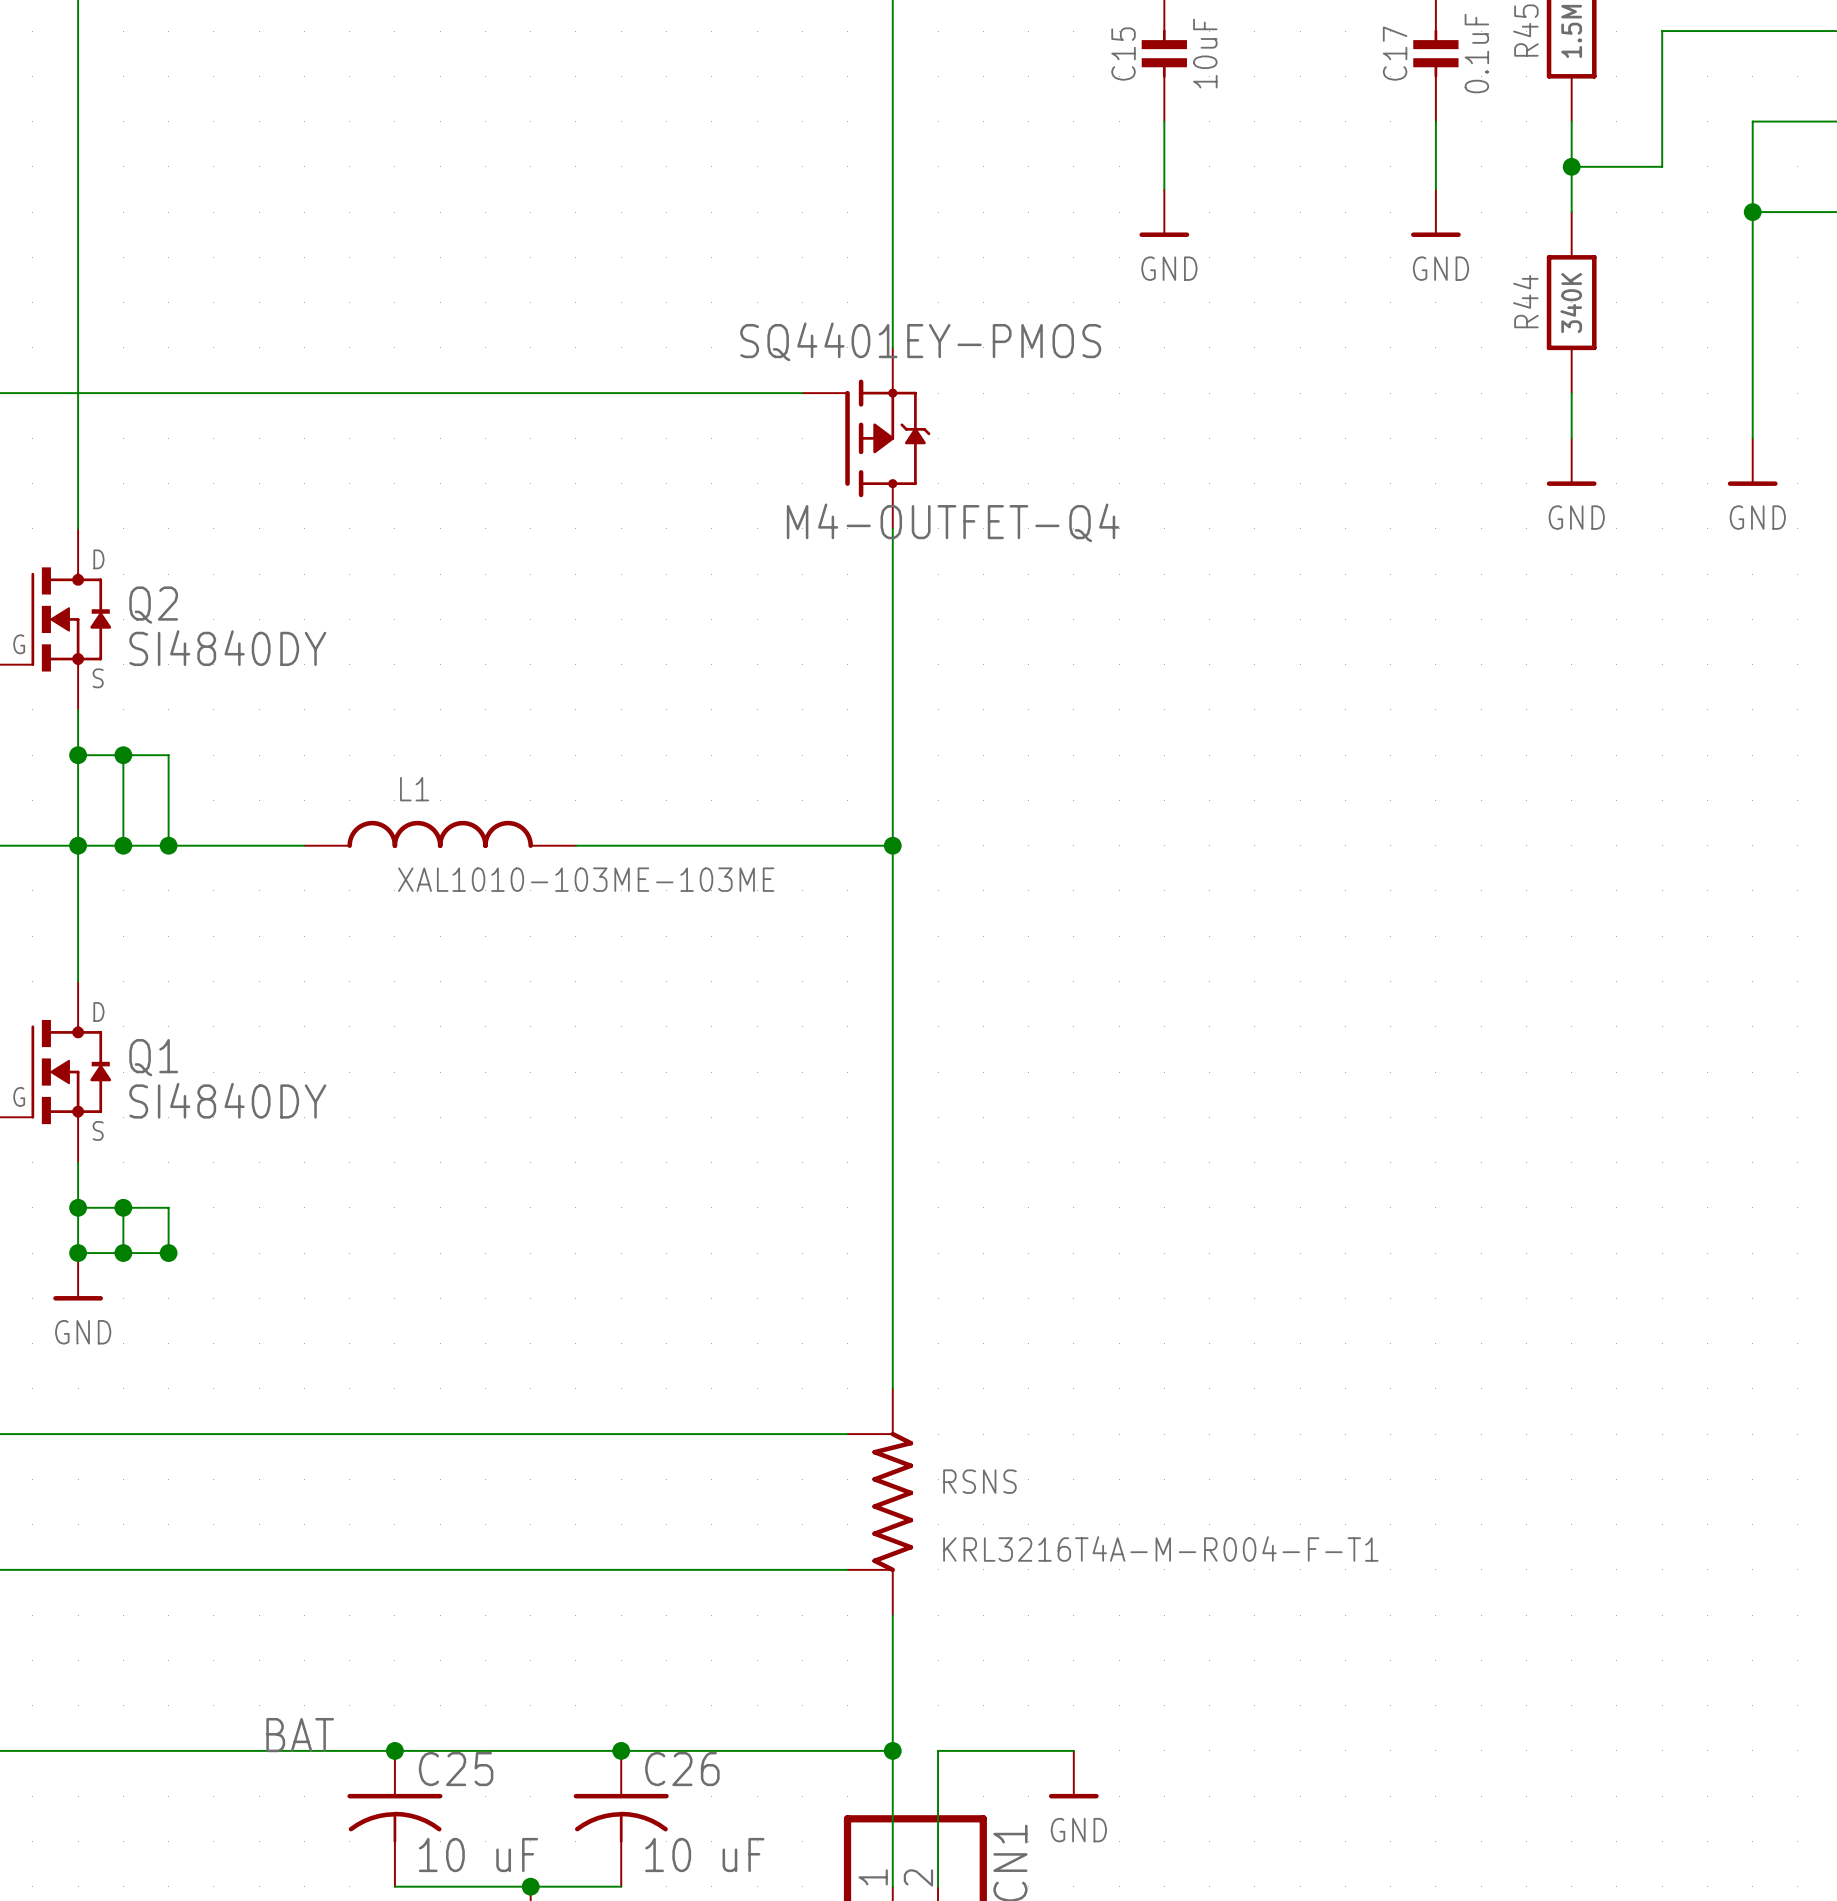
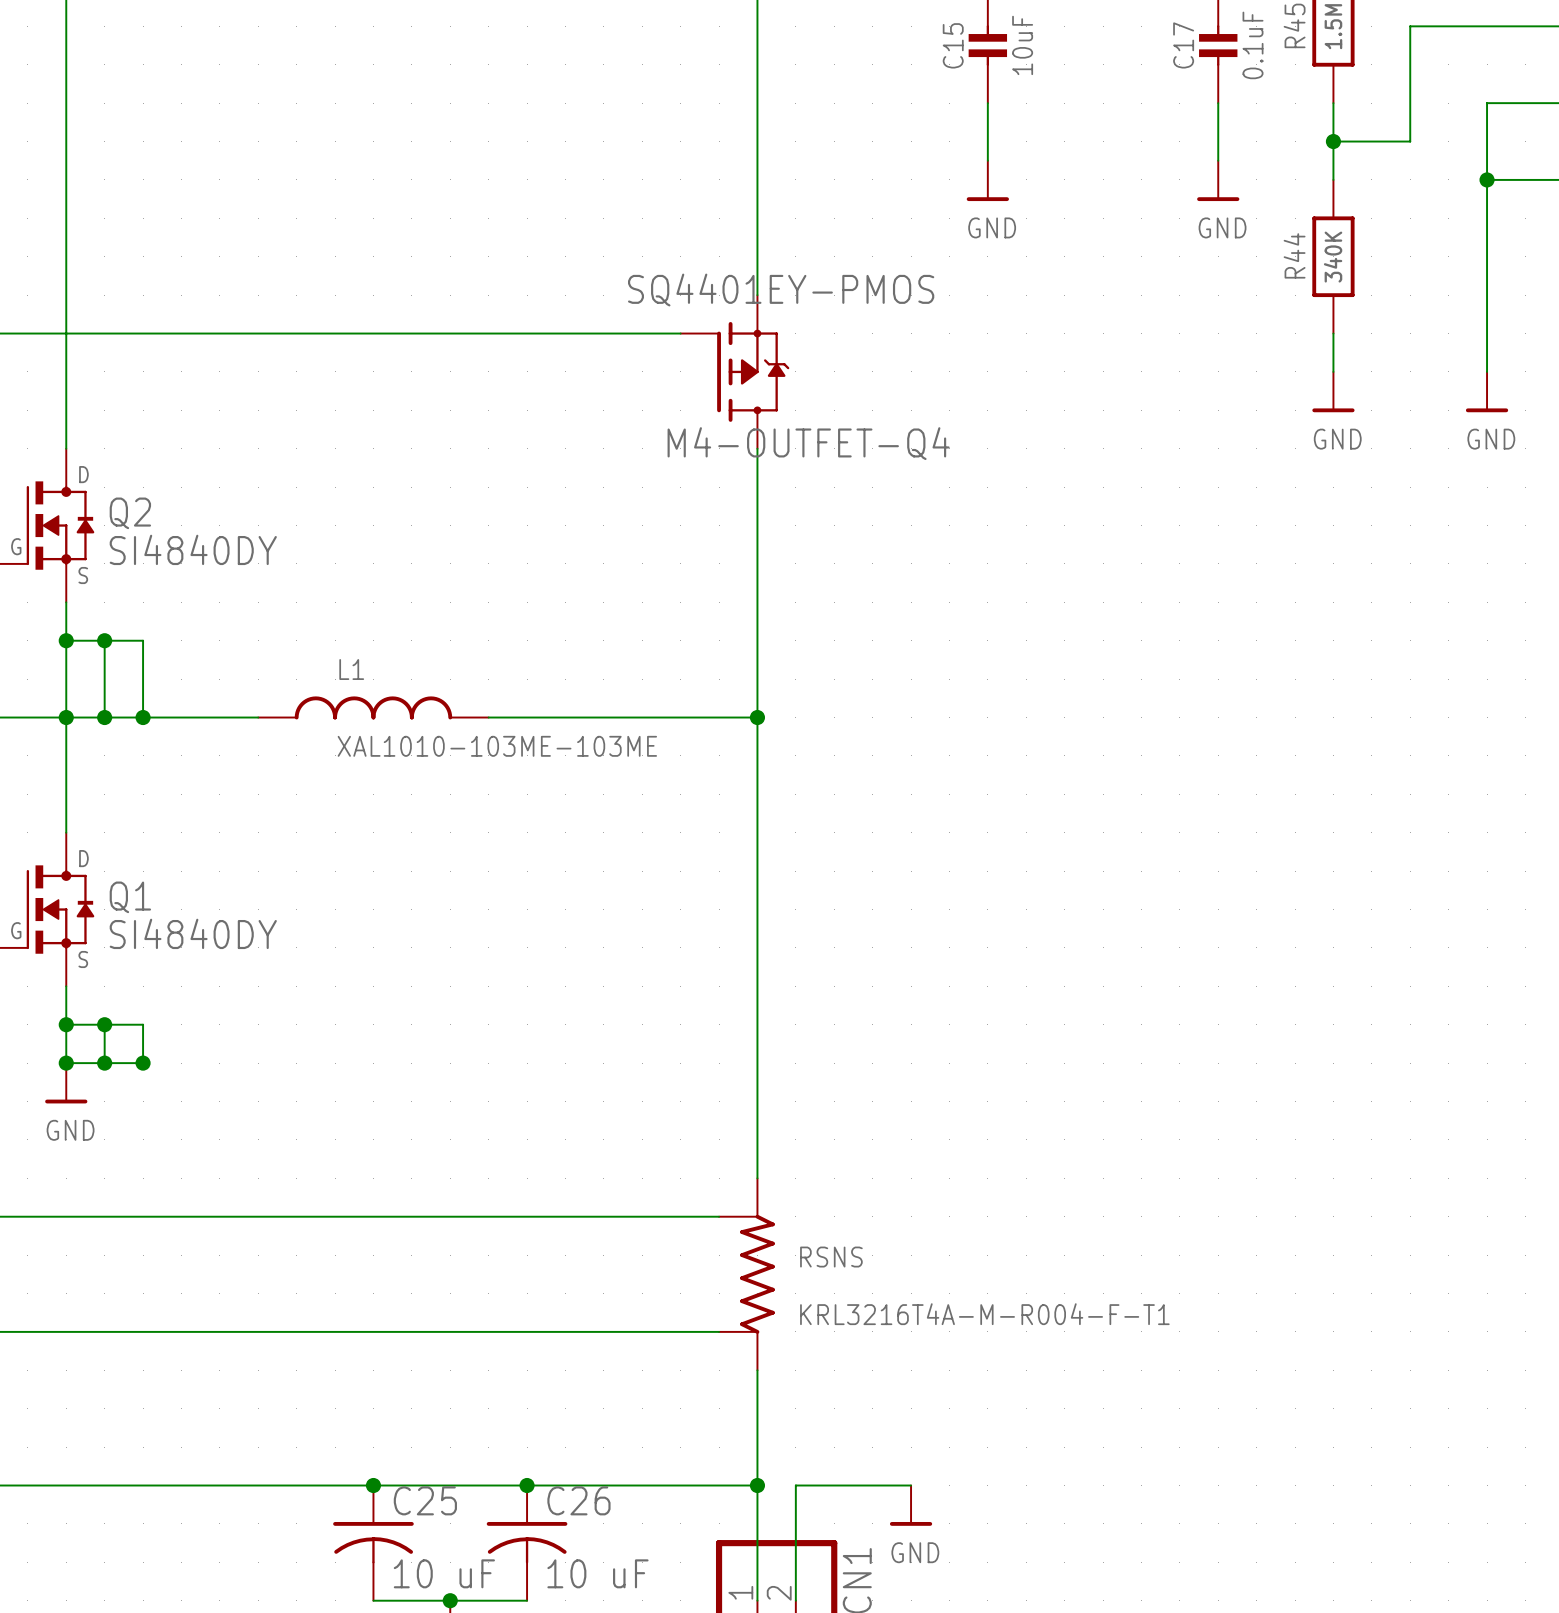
label: BAT (300, 1735) -> none
junction position: (394, 1750) -> (373, 1485)
C25 position: (394, 1818) -> (373, 1543)
wire: (394, 1886) (440, 1886) -> none

